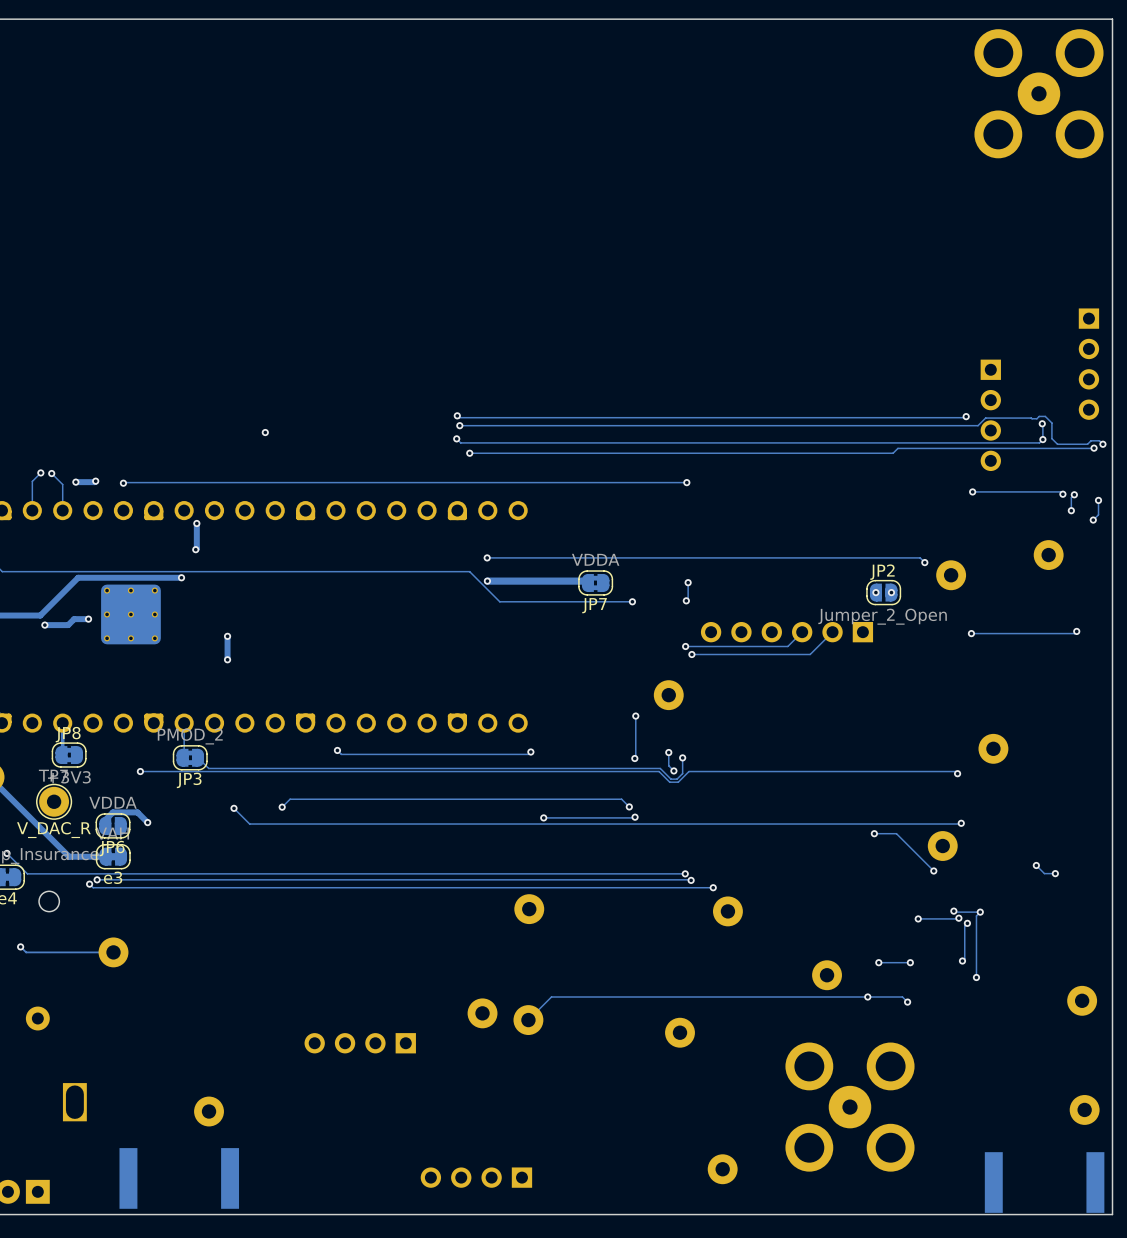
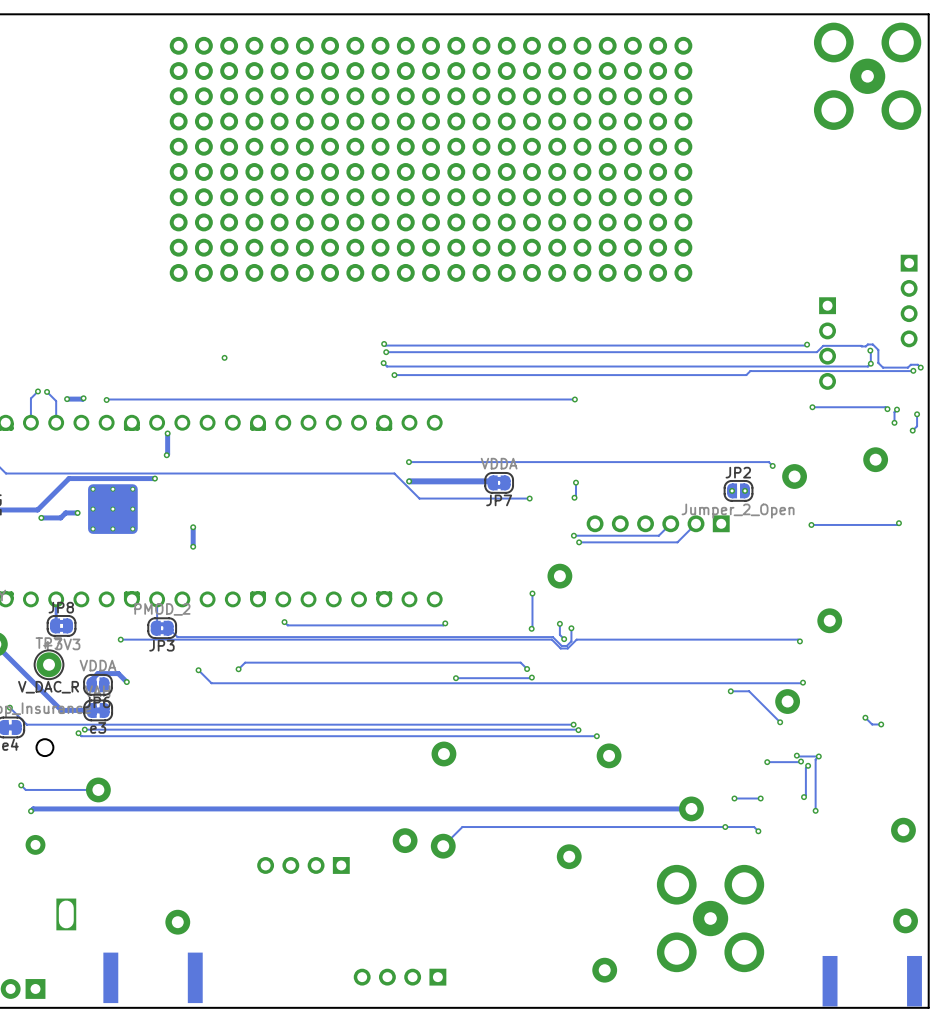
part: none -> (431, 159)
track: none -> (691, 808) (33, 808) (31, 811)
via: none -> (31, 811)

